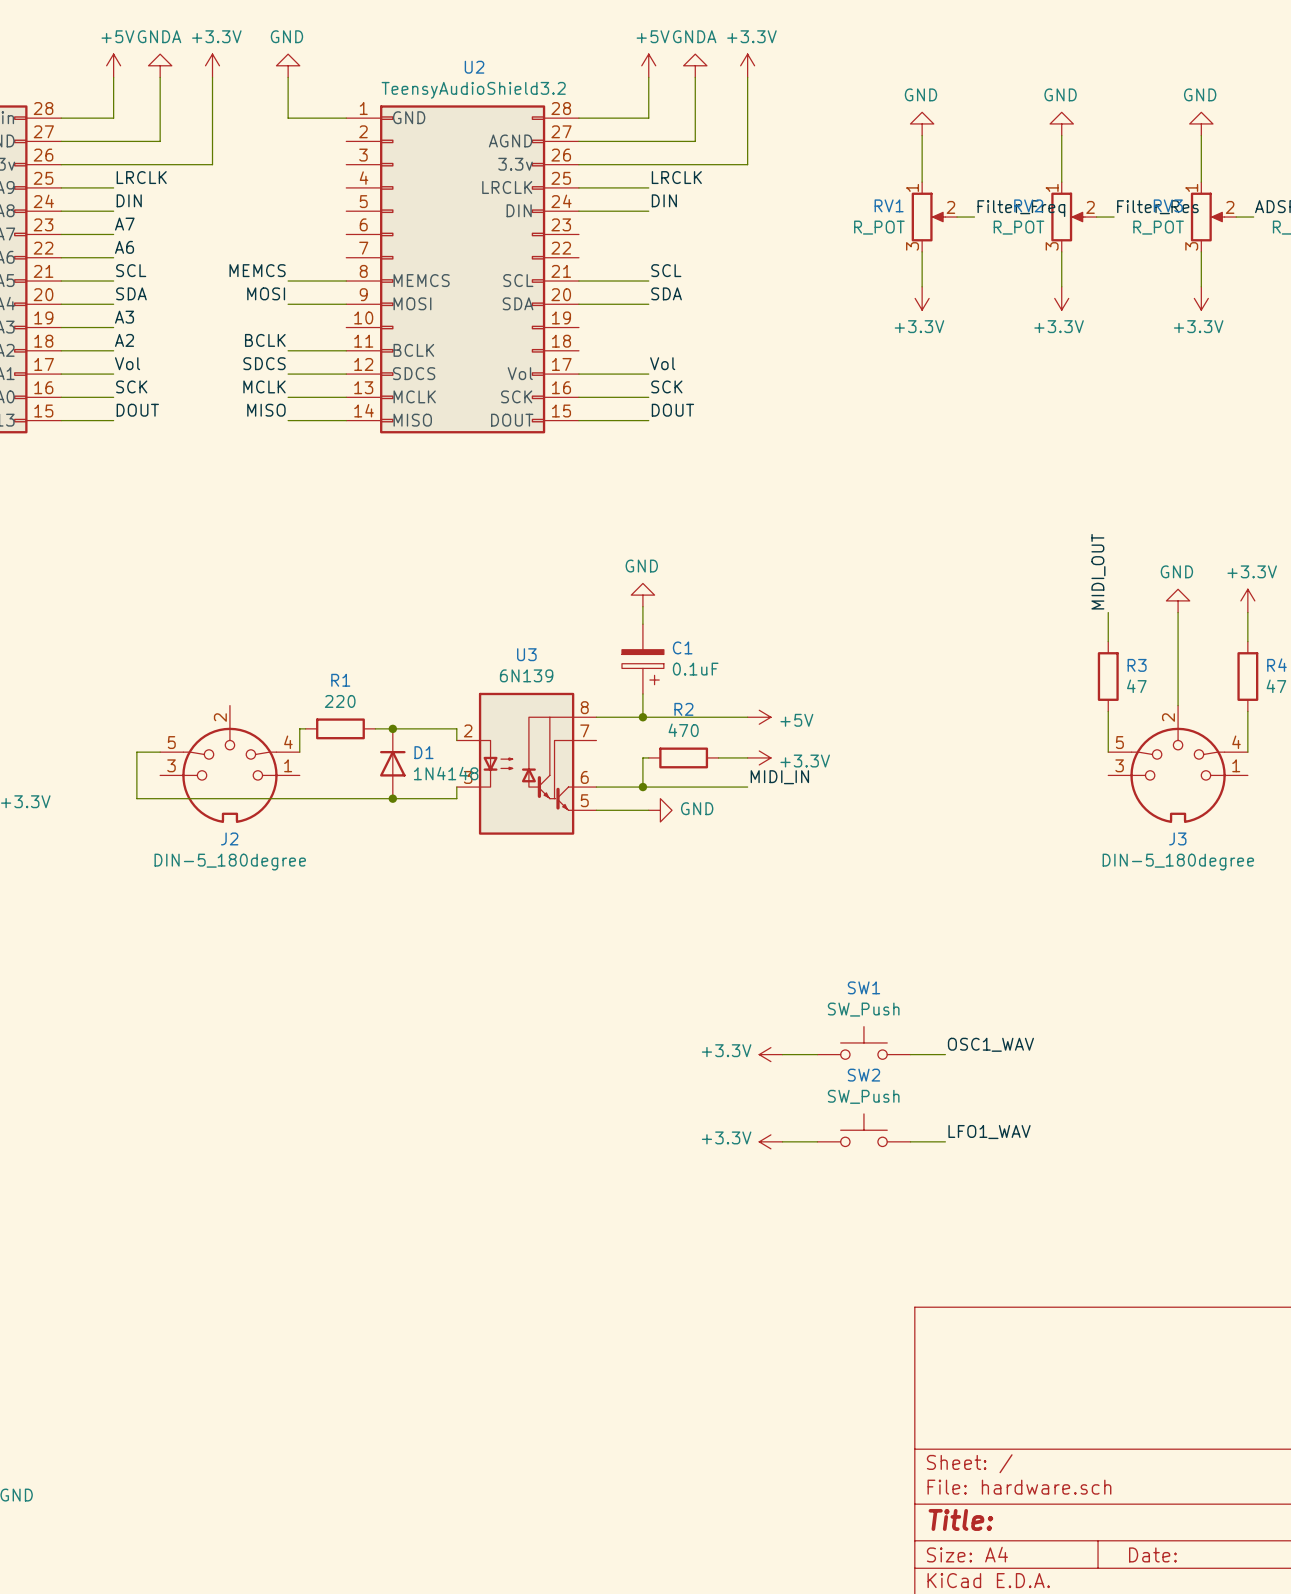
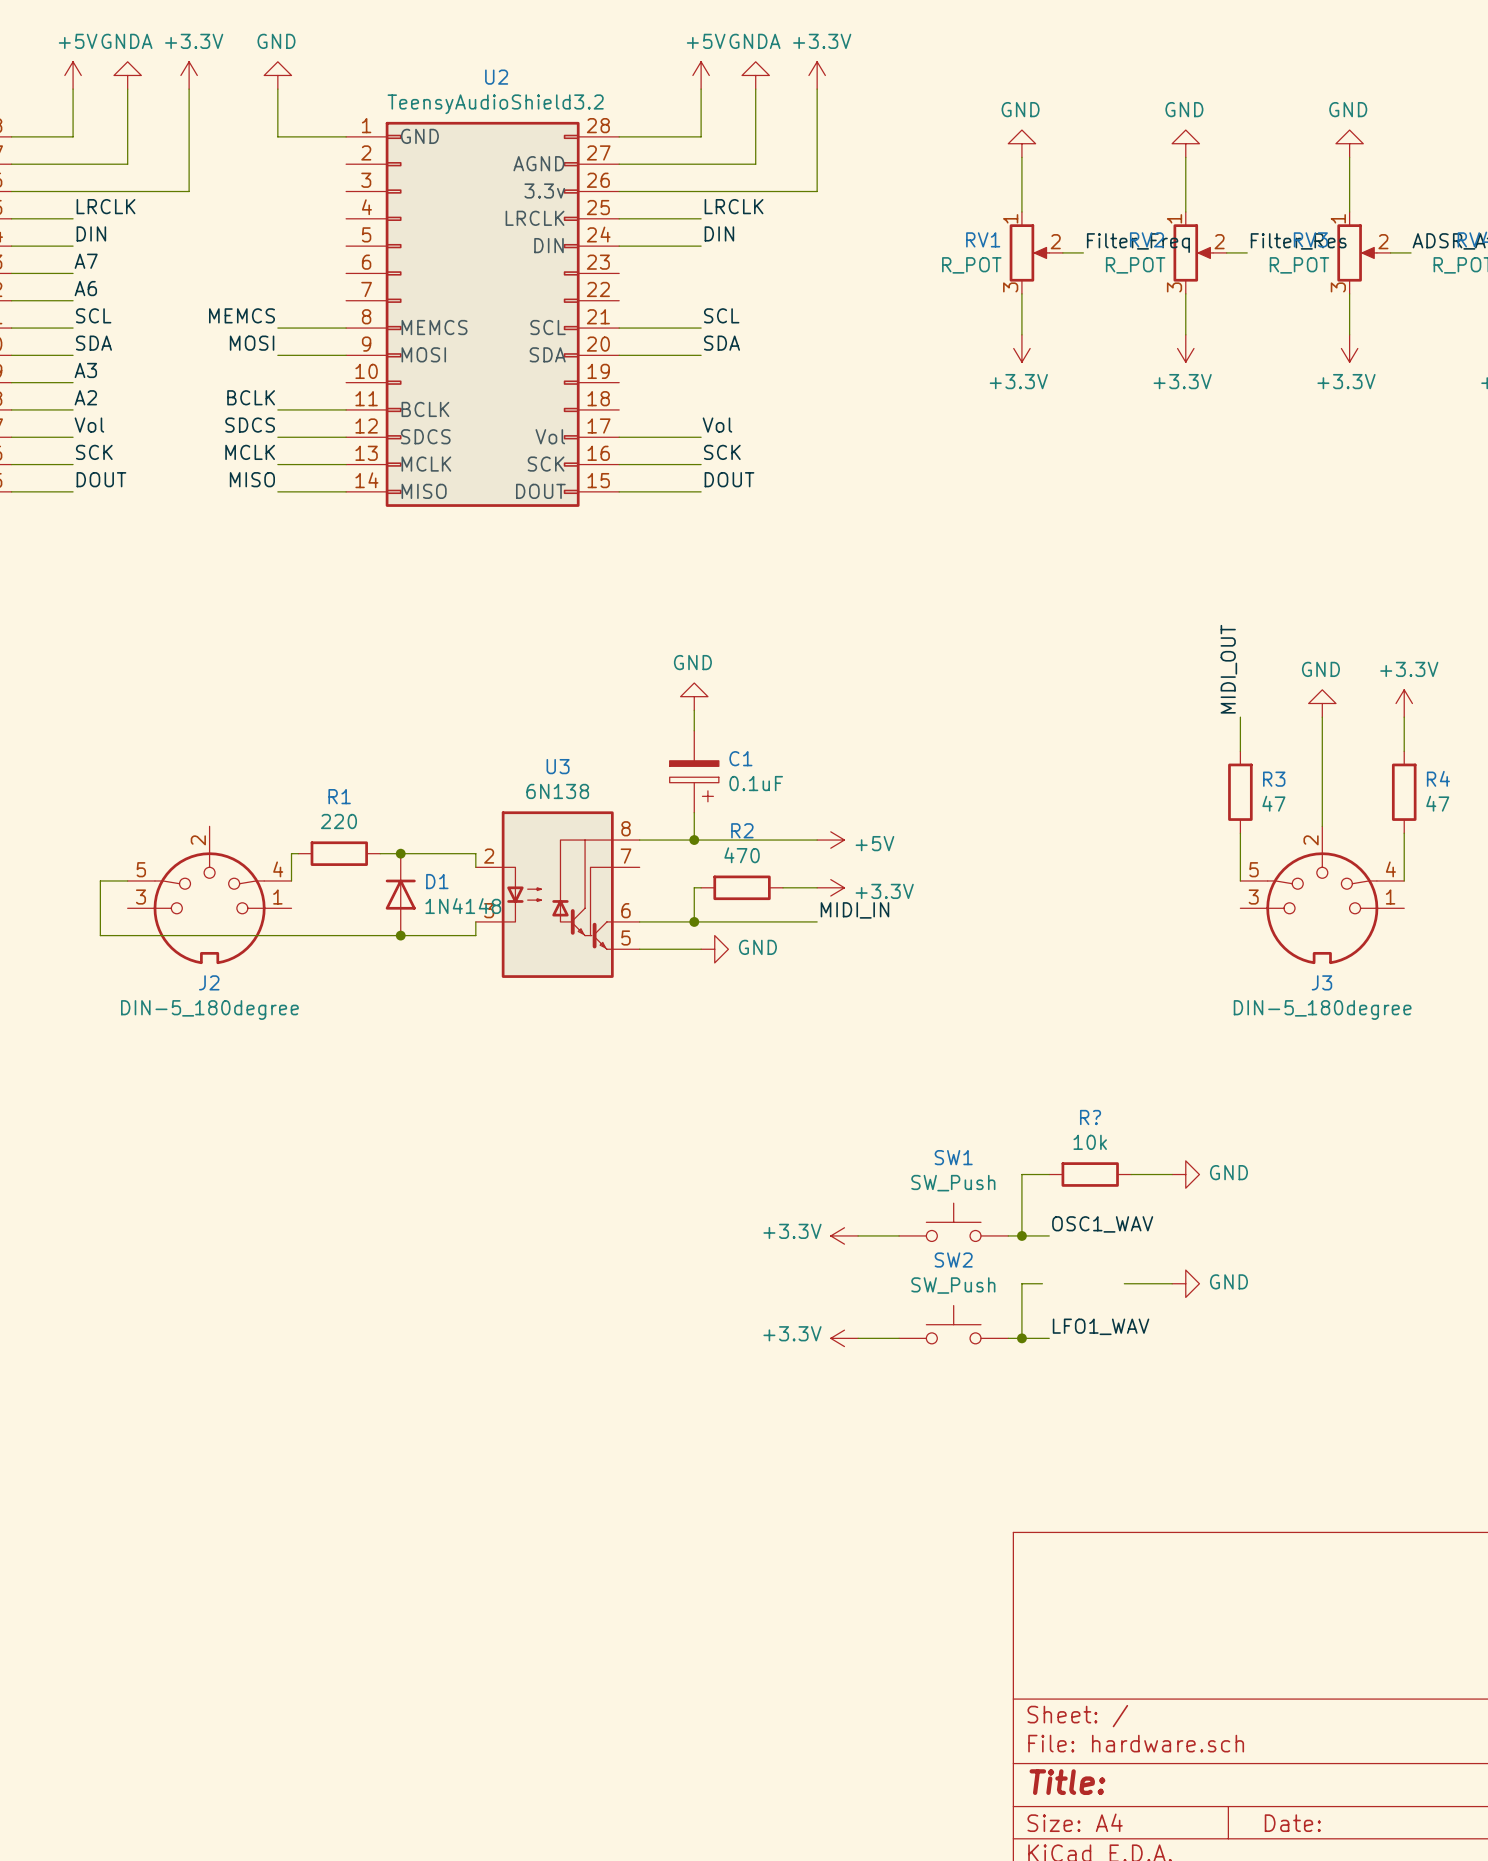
U3 value: 6N139 (526, 675) -> 6N138 (557, 791)
wire: none -> (1049, 1174) (1021, 1174) (1021, 1235)
R?: none -> 10k (1090, 1174)
wire: none -> (1131, 1174) (1172, 1174)
power symbol: none -> GND (1185, 1174)
junction: none -> (1021, 1235)
wire: none -> (1042, 1283) (1021, 1283) (1021, 1338)
wire: none -> (1124, 1283) (1172, 1283)
power symbol: none -> GND (1185, 1283)
junction: none -> (1021, 1338)

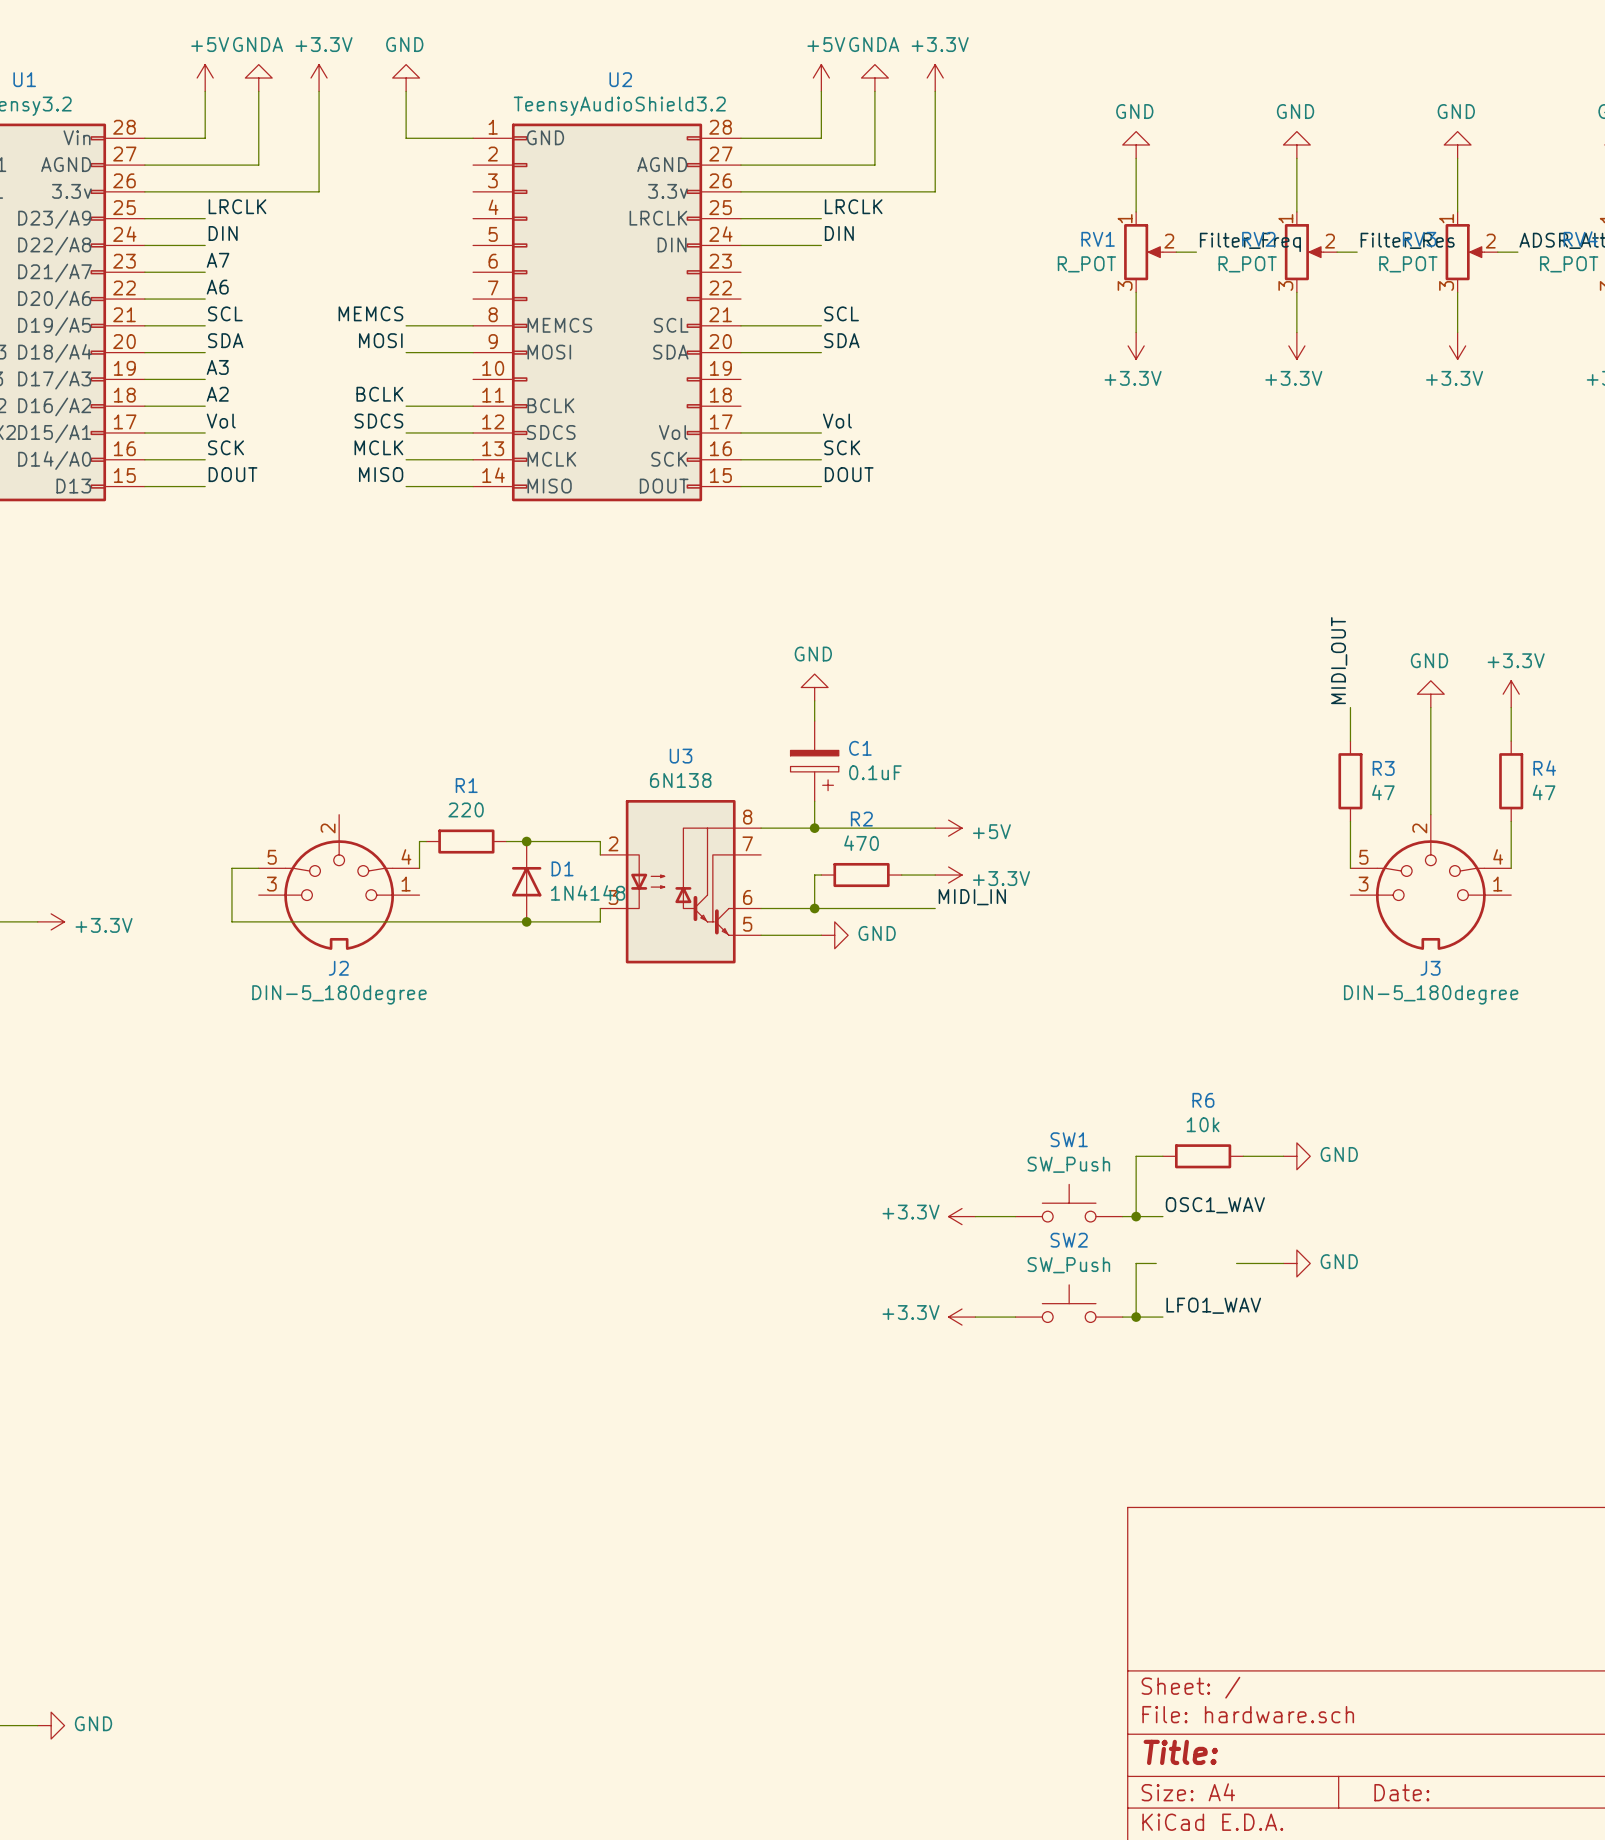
R? name: R? (1090, 1117) -> R6 (1203, 1100)

